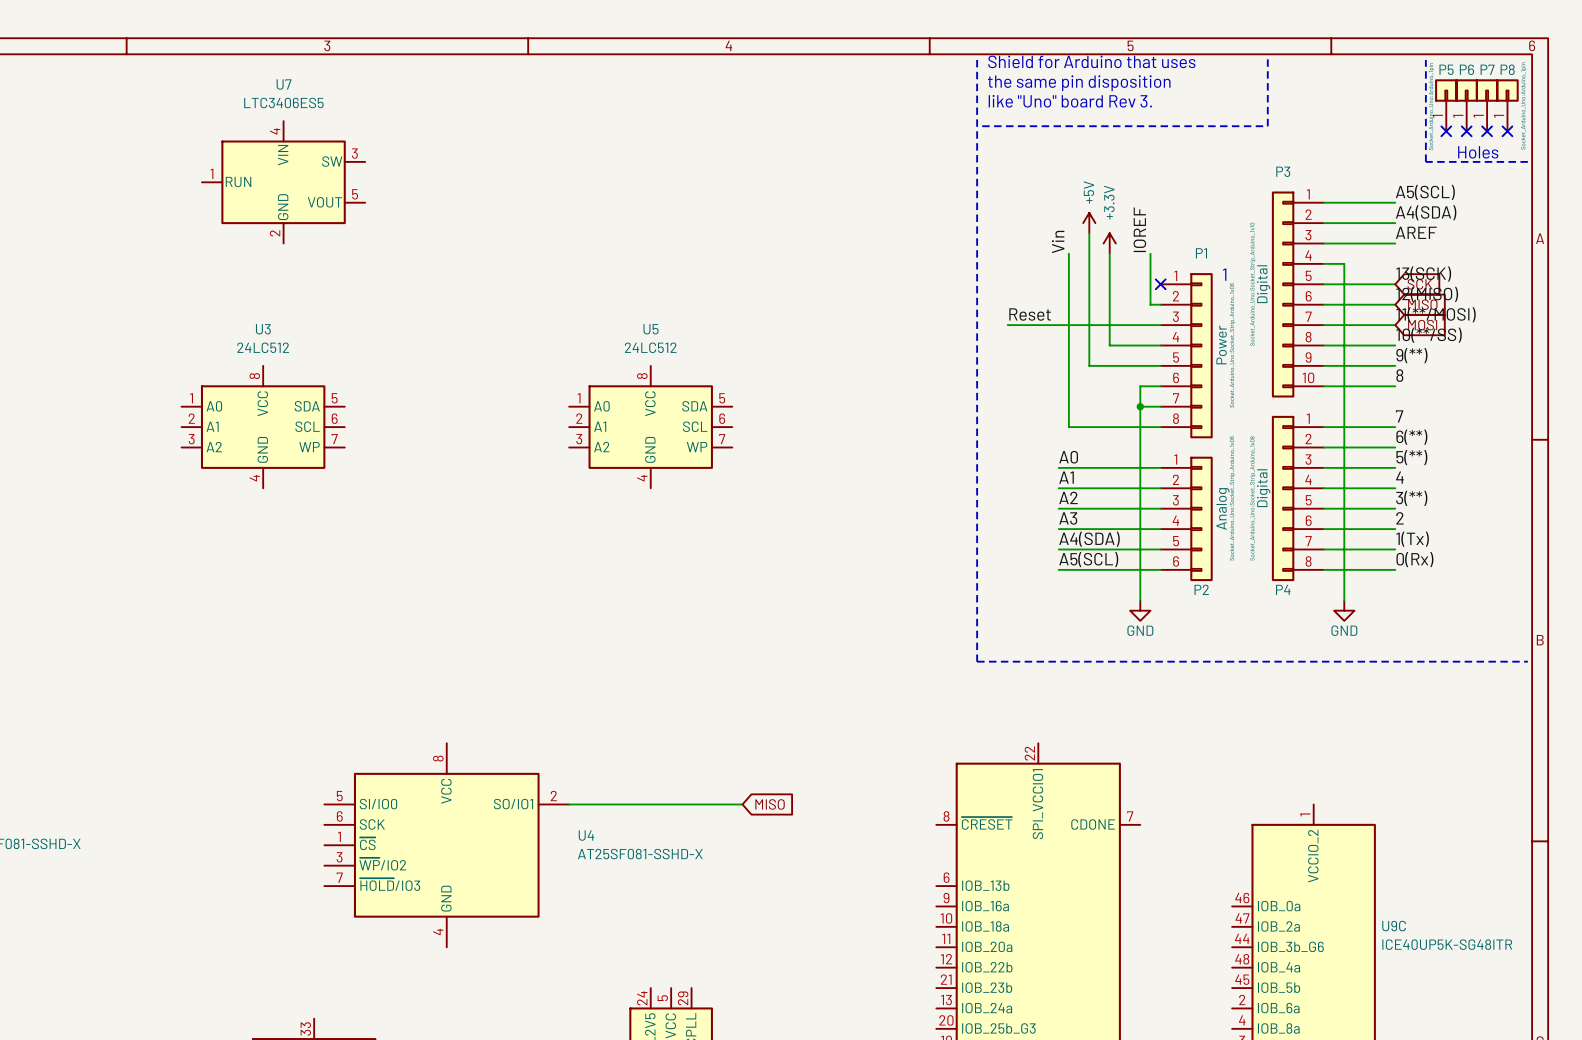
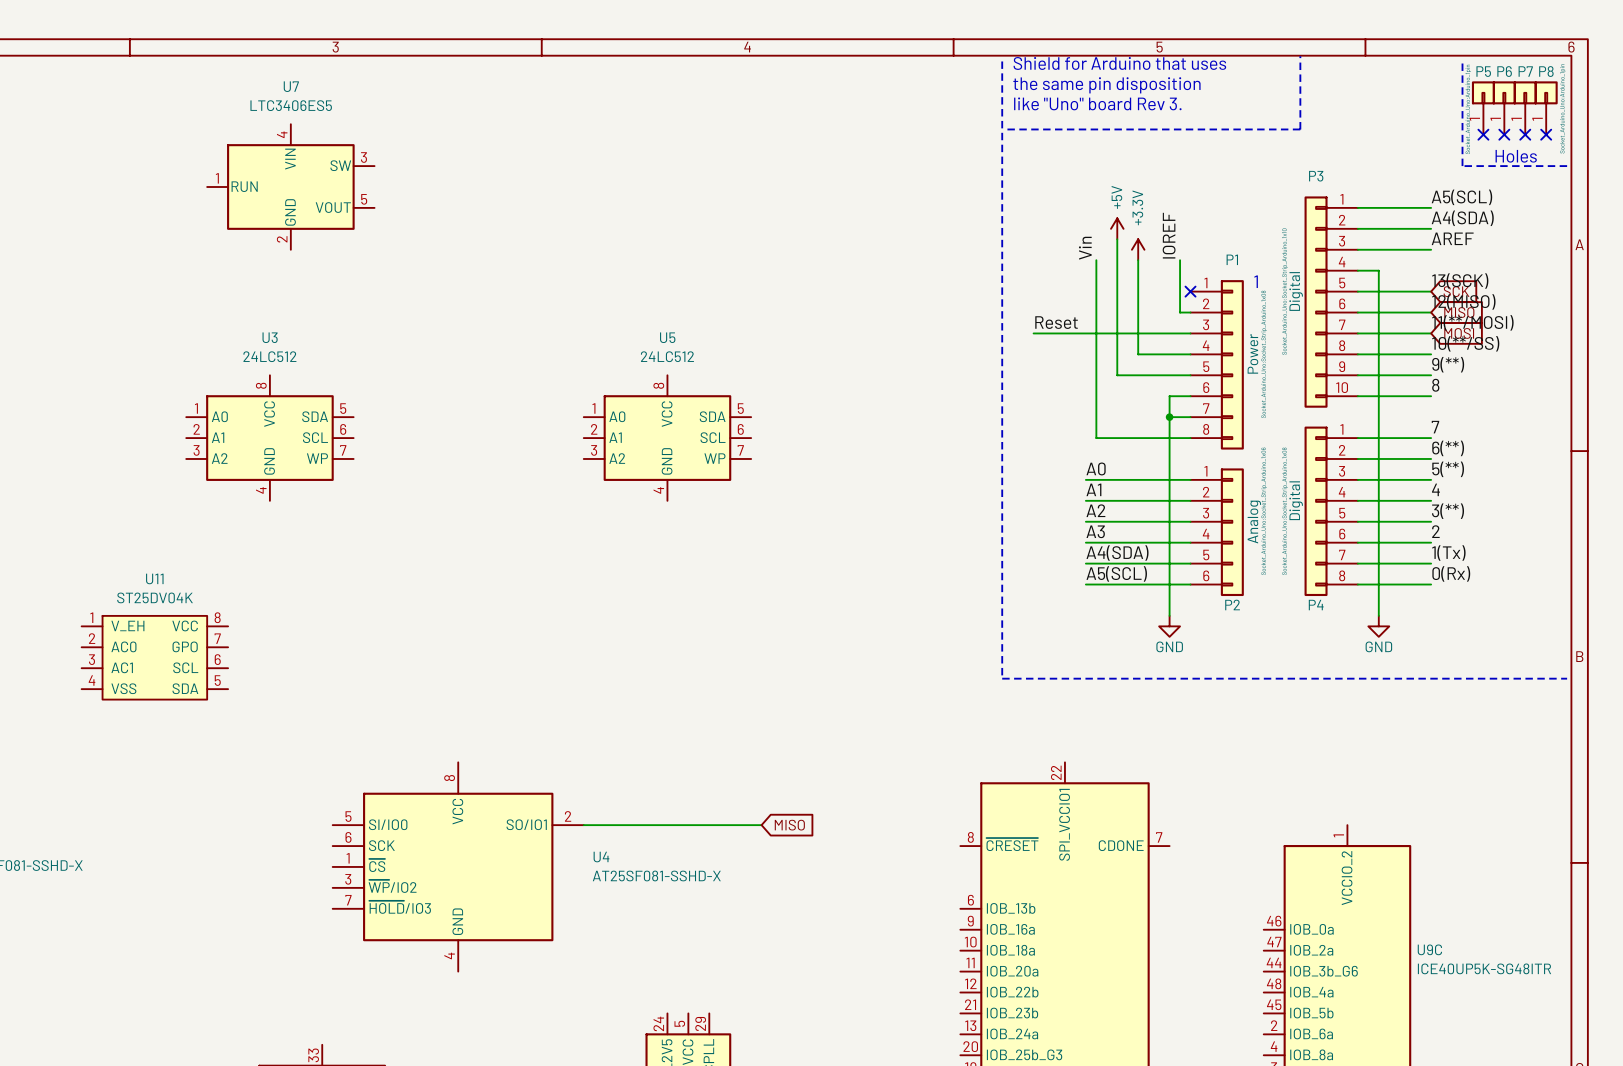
U11: none -> ST25DV04K (154, 657)

